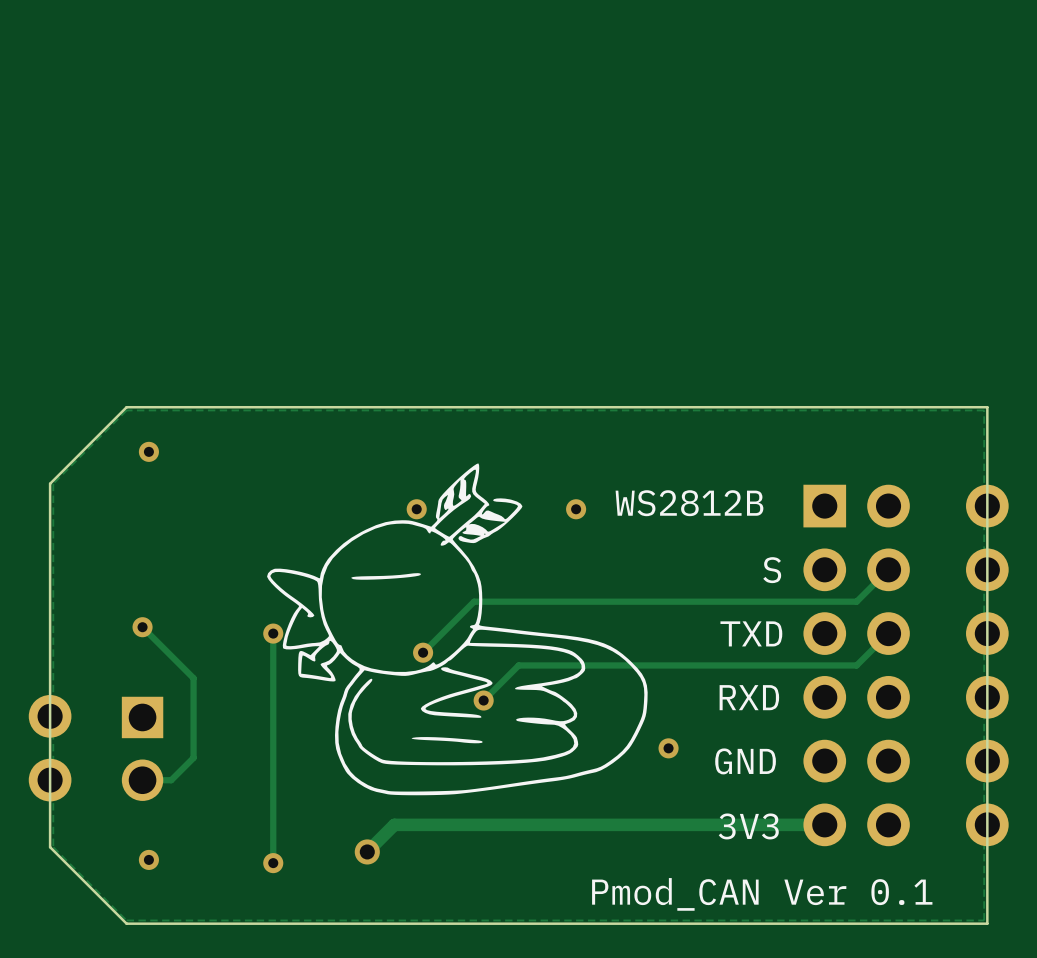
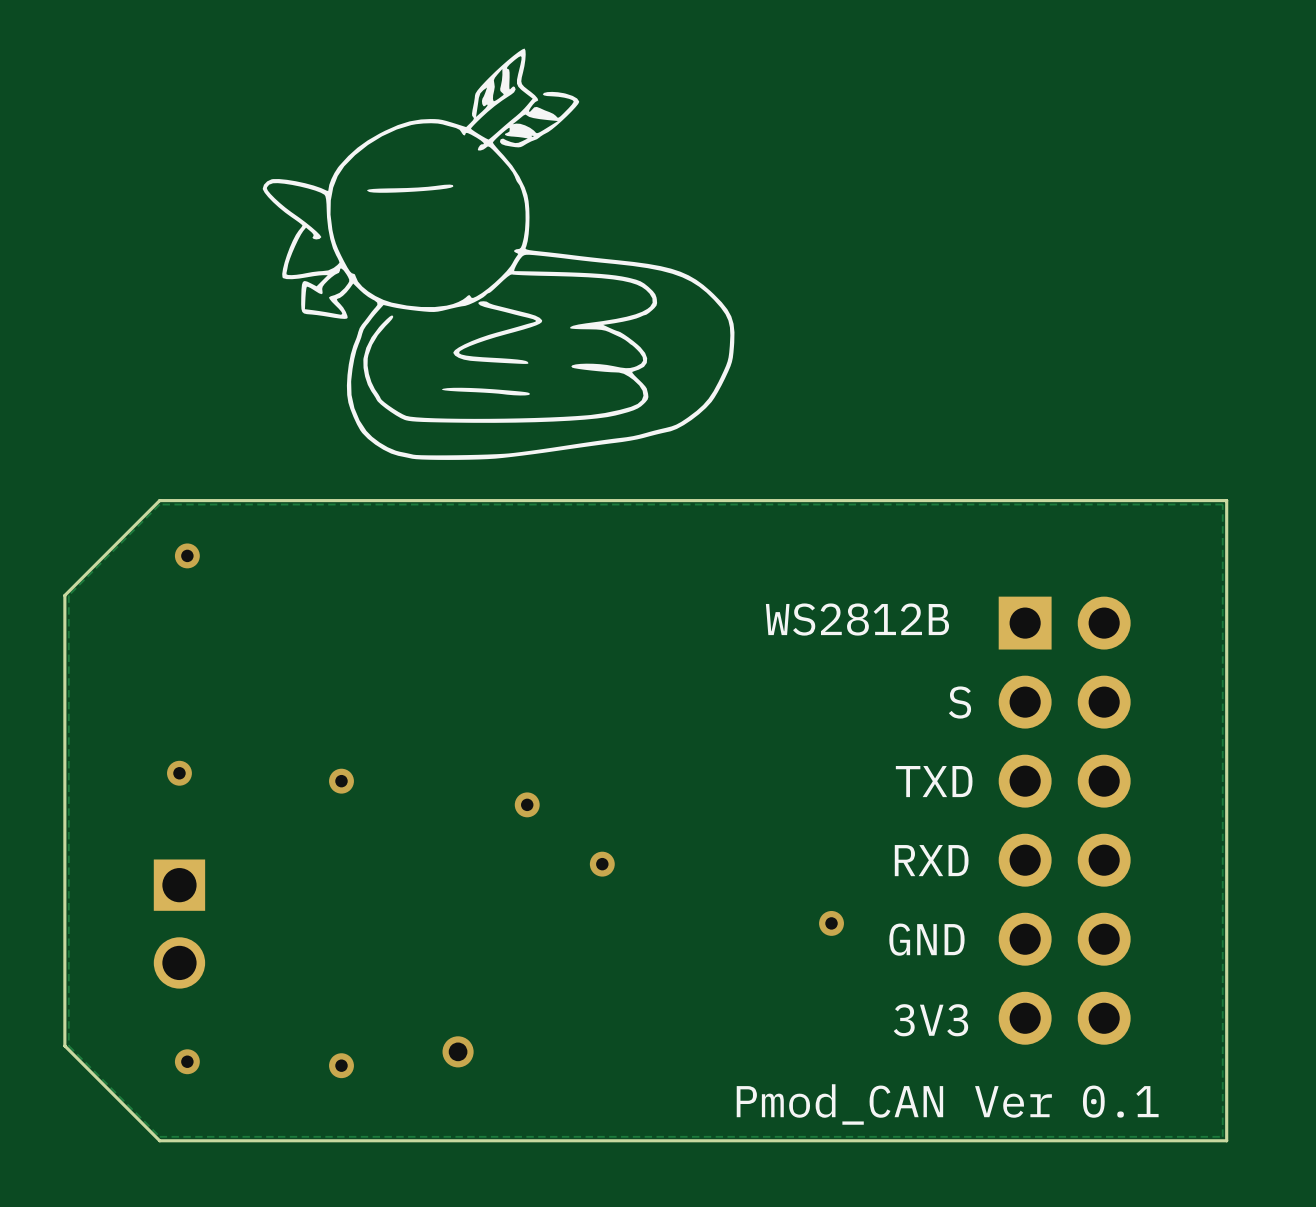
via: (416, 509) -> none
via: (576, 509) -> none
track: (888, 569) (856, 601) (474, 601) (423, 652) -> none
track: (142, 627) (193, 678) (193, 757) (171, 780) (142, 780) -> none
drawing position: (457, 629) -> (498, 254)
track: (273, 633) (273, 863) -> none
track: (888, 633) (856, 665) (518, 665) (483, 700) -> none
part: (987, 665) -> none
part: (50, 748) -> none
track: (824, 824) (394, 824) (367, 851) -> none

